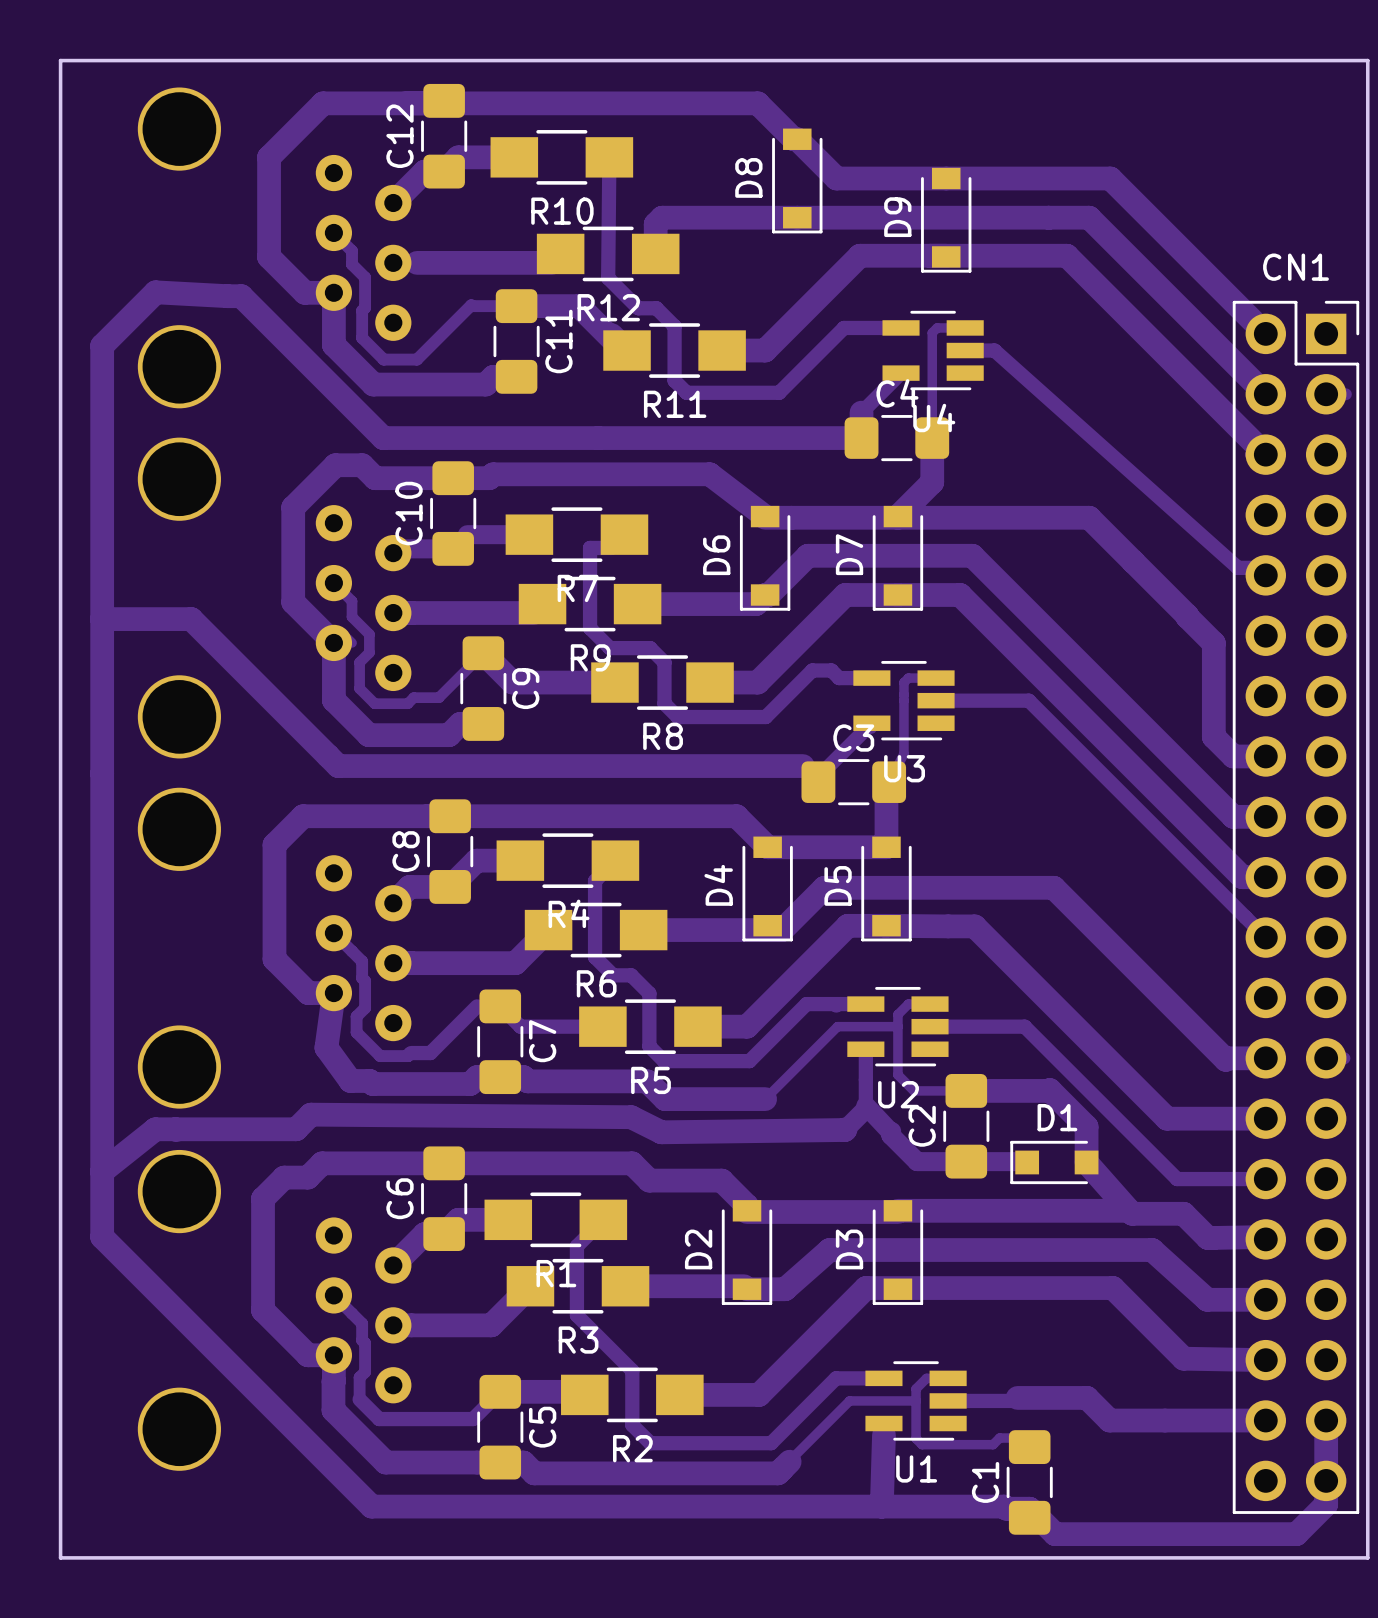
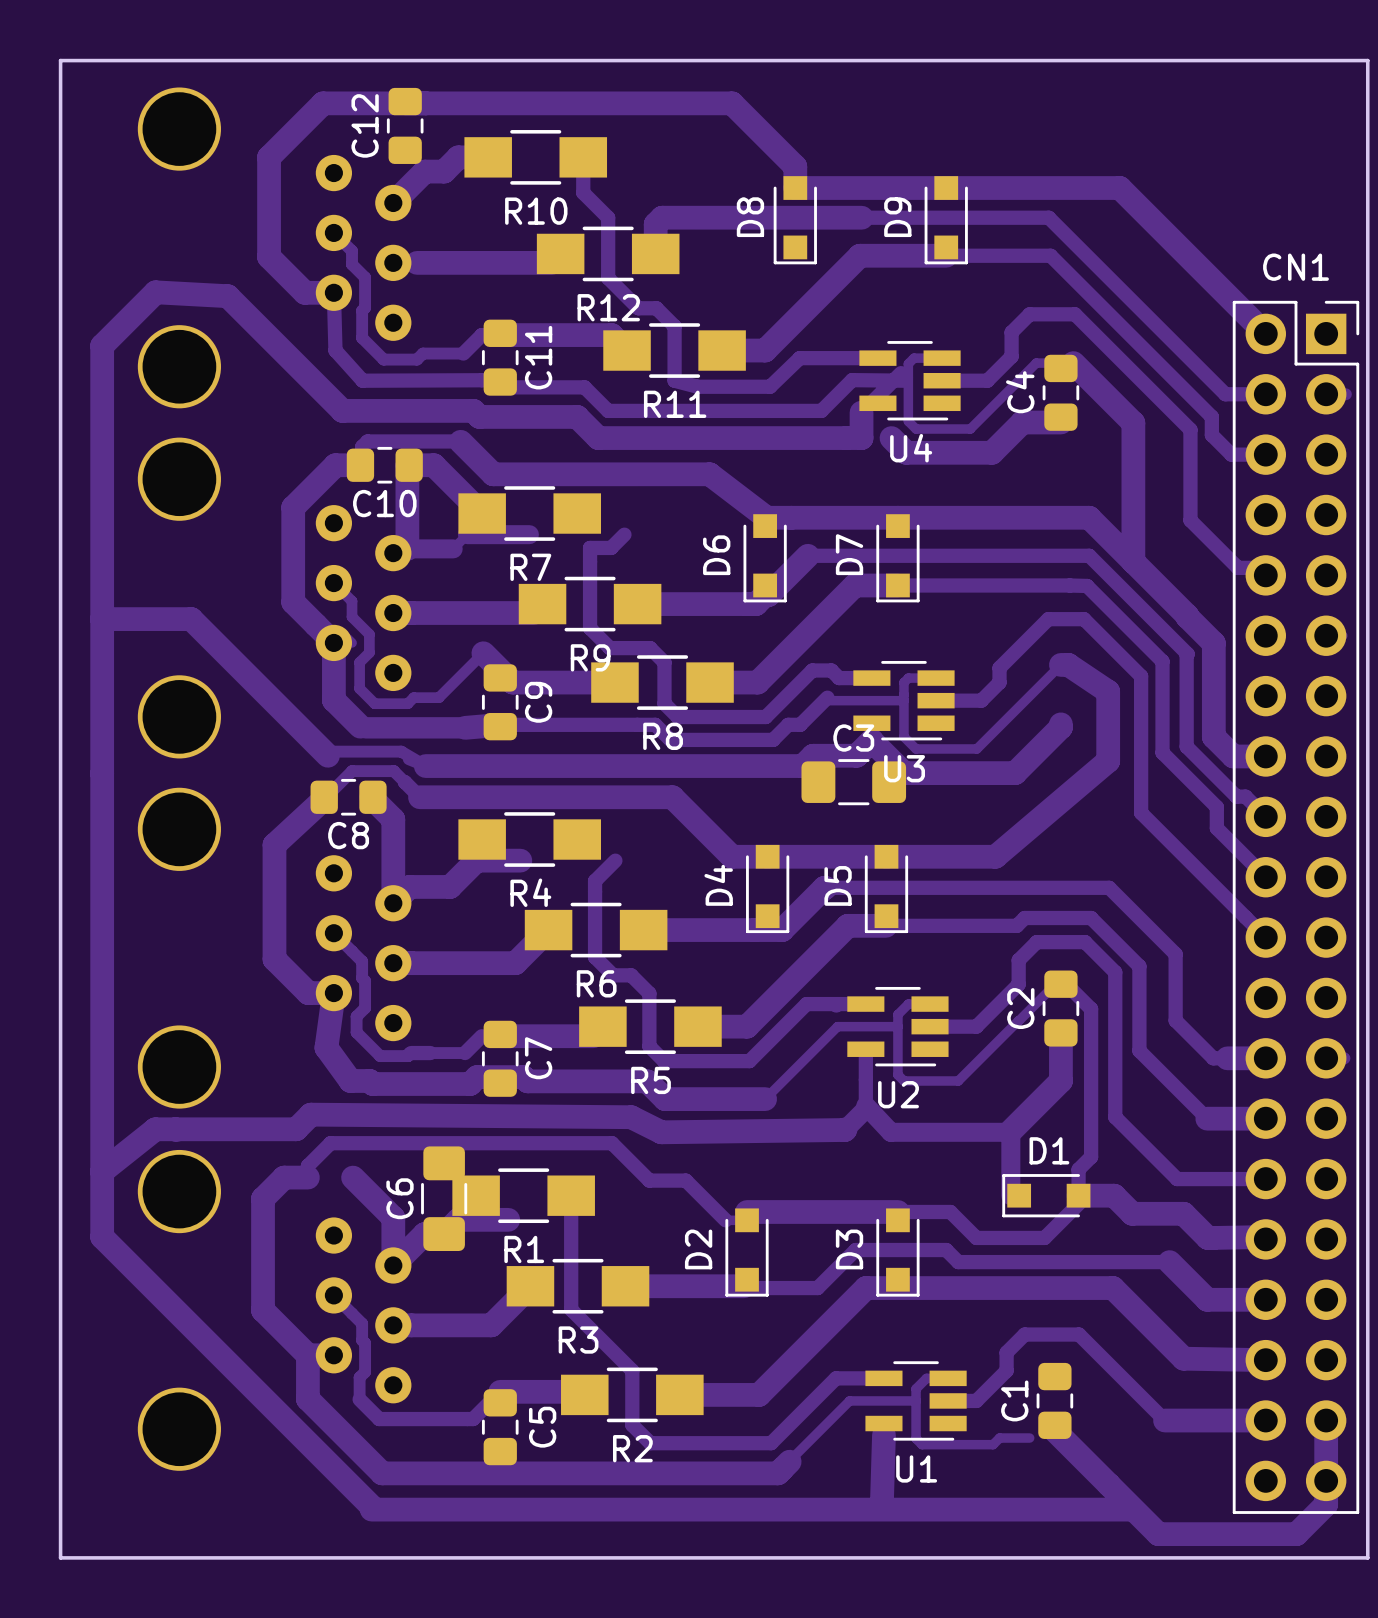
C12 footprint: [421, 83, 468, 189] -> [386, 87, 424, 164]
track: (732, 103) (757, 103) (836, 178) (1110, 178) (1119, 188) -> (732, 103) (795, 166) (795, 188) (1119, 188)
D8 footprint: [772, 128, 823, 234] -> [773, 176, 817, 265]
R10 position: (561, 157) -> (535, 157)
track: (609, 157) (608, 278) -> (583, 157) (583, 192) (608, 217) (608, 278)
D9 footprint: [921, 167, 972, 273] -> [924, 176, 968, 265]
track width: thick (662, 217) (1089, 217) -> thin (662, 217) (1089, 217)
track: (1048, 217) (1089, 217) (1265, 394) -> (1048, 217) (1225, 394) (1265, 394)
track width: thick (946, 255) (1050, 255) -> thin (946, 255) (1050, 255)
track: (1050, 255) (1066, 255) (1265, 454) -> (1050, 255) (1211, 416) (1211, 435) (1231, 454) (1265, 454)
C11 footprint: [493, 289, 540, 394] -> [481, 319, 519, 396]
track: (333, 292) (333, 345) (373, 384) (485, 384) (493, 376) (516, 376) -> (333, 292) (335, 350) (362, 380) (500, 380)
track: (227, 296) (241, 296) (383, 438) (598, 438) -> (227, 296) (342, 410) (473, 410) (479, 416) (577, 416) (598, 438)
track: (901, 327) (844, 327) (779, 392) (686, 392) (674, 380) -> (877, 358) (799, 358) (770, 386) (697, 386) (674, 380)
track: (965, 327) (937, 327) (932, 332) (932, 482) (897, 516) -> none
track: (627, 350) (623, 350) (579, 306) (471, 305) (423, 353) -> (611, 335) (481, 335) (463, 353) (423, 353)
U4 position: (933, 350) -> (910, 380)
track: (965, 350) (994, 350) (1237, 567) -> (942, 380) (987, 380) (1011, 356) (1011, 332) (1029, 314) (1074, 314) (1190, 429) (1190, 520) (1237, 567)
track: none -> (942, 358) (914, 358) (908, 363) (908, 421) (916, 429) (970, 429) (1036, 363) (1073, 363) (1133, 422) (1133, 561)
track: none -> (908, 378) (905, 380) (852, 380) (821, 410) (608, 410) (584, 387) (507, 387)
C4 name position: C4 (897, 393) -> C4 (1020, 392)
C4 footprint: [844, 415, 950, 462] -> [1042, 354, 1080, 431]
track: none -> (1060, 422) (1022, 422) (992, 452) (906, 452) (891, 438)
track: none -> (460, 441) (493, 474)
C10 footprint: [430, 461, 477, 566] -> [346, 446, 423, 484]
track: (362, 465) (375, 478) (489, 478) (493, 474) -> (362, 465) (362, 446) (367, 441) (460, 441)
track: none -> (407, 465) (433, 465) (482, 513) (482, 503)
track: none -> (407, 465) (407, 548)
D6 footprint: [739, 505, 791, 611] -> [743, 514, 787, 603]
D7 footprint: [872, 505, 924, 611] -> [876, 514, 920, 603]
C10 name position: C10 (409, 513) -> C10 (384, 503)
R7 position: (576, 534) -> (529, 513)
track width: thick (807, 555) (972, 555) -> thin (807, 555) (972, 555)
track: (972, 555) (1233, 816) (1265, 816) -> (972, 555) (1089, 555) (1187, 654) (1186, 746) (1236, 796) (1245, 796) (1265, 816)
track: (845, 595) (960, 595) (1242, 877) (1265, 877) -> (845, 595) (854, 585) (1087, 585) (1162, 661) (1162, 752) (1216, 807) (1216, 828) (1265, 877)
C9 footprint: [460, 636, 507, 741] -> [481, 664, 519, 741]
track: none -> (827, 697) (800, 724) (788, 724) (773, 739) (670, 739) (655, 724) (500, 724) (465, 727) (365, 727)
track: none -> (827, 700) (903, 700)
track: (981, 700) (1028, 700) (1141, 812) -> (981, 700) (999, 682) (999, 667) (1048, 619) (1084, 619) (1141, 676) (1141, 812)
track: (483, 723) (460, 723) (448, 735) (368, 735) (360, 726) -> none
track: (871, 723) (818, 776) (818, 782) -> (871, 723) (871, 741) (903, 773) (1015, 773) (1060, 727) (1060, 724)
track: none -> (871, 728) (871, 740) (856, 755) (813, 755) (802, 766)
track: (903, 736) (903, 753) (886, 784) (886, 847) (767, 847) (736, 816) (303, 816) (274, 844) -> (903, 736) (916, 748) (976, 748) (1060, 664) (1068, 664) (1108, 691) (1108, 761) (995, 856) (732, 856) (672, 797) (419, 797) (393, 771) (352, 771) (326, 797)
track: none -> (332, 751) (401, 751) (425, 766) (408, 759)
track: (327, 755) (338, 766) (425, 766) -> none
track: none -> (326, 797) (274, 844)
track: none -> (371, 797) (393, 819) (393, 903)
C8 footprint: [427, 799, 474, 904] -> [310, 778, 387, 816]
D4 footprint: [742, 836, 793, 942] -> [746, 844, 790, 934]
D5 footprint: [861, 836, 912, 942] -> [864, 844, 909, 934]
C8 name position: C8 (406, 851) -> C8 (348, 835)
R4 position: (567, 860) -> (529, 839)
track width: thick (825, 887) (1053, 887) -> thin (825, 887) (1053, 887)
track: (1053, 887) (1225, 1059) (1227, 1058) -> (1053, 887) (1109, 887) (1175, 954) (1175, 1020) (1213, 1058) (1227, 1058)
track: (885, 925) (974, 926) (1167, 1118) (1207, 1118) -> (885, 925) (1016, 925) (1024, 918) (1091, 918) (1139, 966) (1139, 1050) (1207, 1118)
C7 footprint: [477, 989, 524, 1095] -> [481, 1020, 519, 1097]
track: none -> (1019, 1020) (1060, 978) (1091, 1009) (1091, 1157) (1078, 1169) (1078, 1195)
track: (602, 1026) (520, 1026) (500, 1006) (477, 1006) (430, 1053) -> (602, 1026) (593, 1036) (481, 1036) (465, 1053) (430, 1053)
track: (976, 1026) (1024, 1026) (1115, 1117) -> (976, 1026) (1018, 984) (1018, 960) (1036, 942) (1085, 942) (1115, 972) (1115, 1117)
track: none -> (1060, 1038) (1060, 1080) (1010, 1131) (1010, 1195)
C2 footprint: [943, 1073, 990, 1179] -> [1042, 970, 1080, 1047]
track: (903, 1080) (913, 1090) (1049, 1090) (1086, 1126) (1086, 1162) (1129, 1210) (897, 1210) -> (903, 1080) (958, 1080) (1018, 1020)
track: (891, 1131) (890, 1135) (917, 1161) (1027, 1162) -> none
track: none -> (890, 1132) (1011, 1132)
D1 position: (1054, 1162) -> (1046, 1195)
track: (632, 1163) (322, 1163) (307, 1177) -> (632, 1163) (611, 1143) (330, 1143) (307, 1165) (307, 1177)
track width: thick (632, 1163) (649, 1180) (685, 1180) -> thin (632, 1163) (649, 1180) (685, 1180)
track: none -> (354, 1177) (353, 1177) (393, 1217) (393, 1265)
track: (685, 1180) (721, 1180) (747, 1205) (747, 1210) -> (685, 1180) (725, 1220) (747, 1220)
track: none -> (1078, 1195) (1114, 1195) (1129, 1210)
track: none -> (1086, 1195) (1044, 1237) (976, 1237) (950, 1211) (897, 1211)
D2 footprint: [721, 1200, 773, 1305] -> [725, 1208, 769, 1297]
D3 footprint: [872, 1200, 924, 1305] -> [876, 1208, 920, 1297]
R1 position: (555, 1219) -> (523, 1195)
track: (603, 1219) (576, 1246) (576, 1315) -> (590, 1195) (571, 1195) (571, 1309) (576, 1315)
track: (855, 1250) (829, 1250) (785, 1289) (747, 1289) (744, 1286) -> (855, 1250) (817, 1288) (747, 1288)
track width: thick (855, 1250) (946, 1250) -> thin (855, 1250) (946, 1250)
track: (946, 1250) (1152, 1250) (1207, 1299) -> (946, 1250) (958, 1262) (1169, 1262) (1207, 1299)
track: (333, 1355) (333, 1410) (385, 1462) (523, 1462) (534, 1473) -> (307, 1355) (307, 1399) (382, 1473) (534, 1473)
C5 footprint: [477, 1374, 524, 1480] -> [481, 1389, 519, 1466]
track: (976, 1400) (1014, 1400) (1017, 1397) (1087, 1397) (1109, 1420) (1165, 1420) -> (976, 1400) (1006, 1370) (1006, 1352) (1024, 1334) (1079, 1334) (1165, 1420)
C1 footprint: [1006, 1430, 1053, 1535] -> [1036, 1362, 1074, 1439]
track: (371, 1506) (1004, 1506) (1006, 1508) (1029, 1508) (1055, 1534) (1158, 1534) -> (1059, 1430) (1054, 1430) (1158, 1534)
track: none -> (371, 1509) (1132, 1509)

